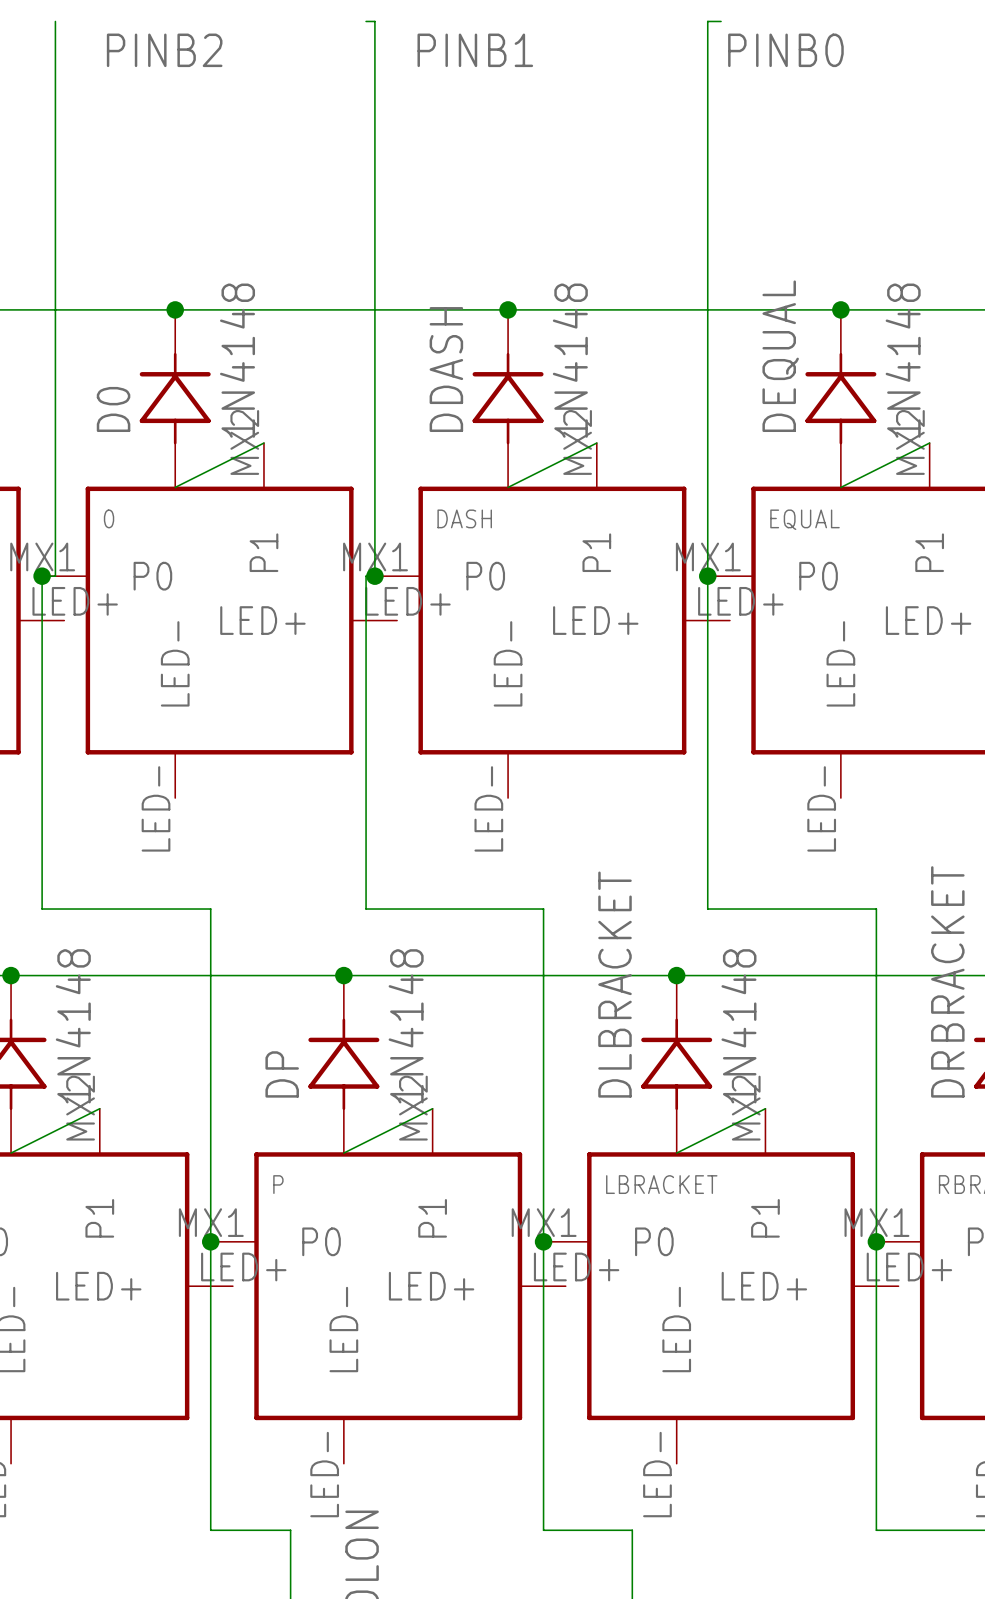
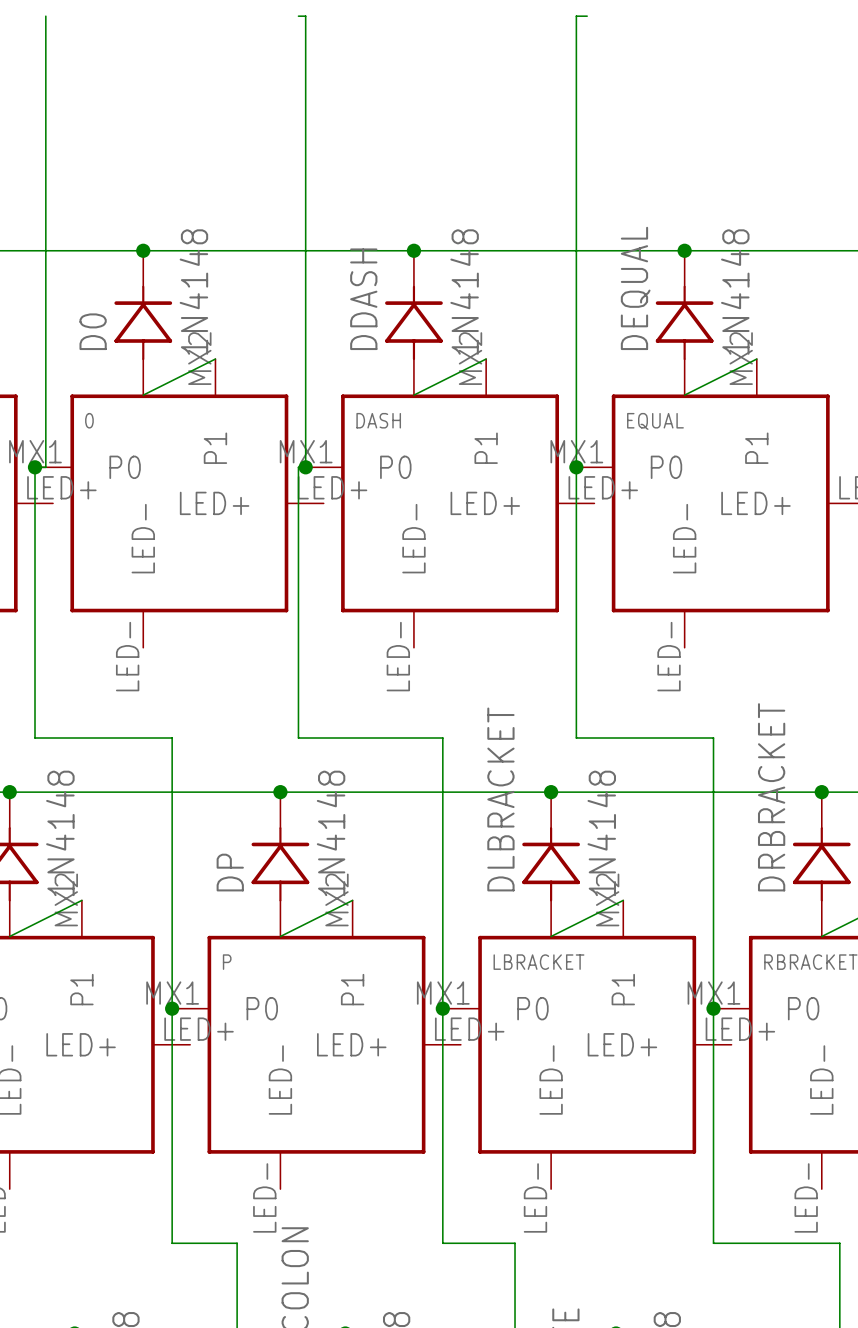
label: PINB2 (164, 50) -> none
label: PINB1 (475, 50) -> none
label: PINB0 (785, 50) -> none

